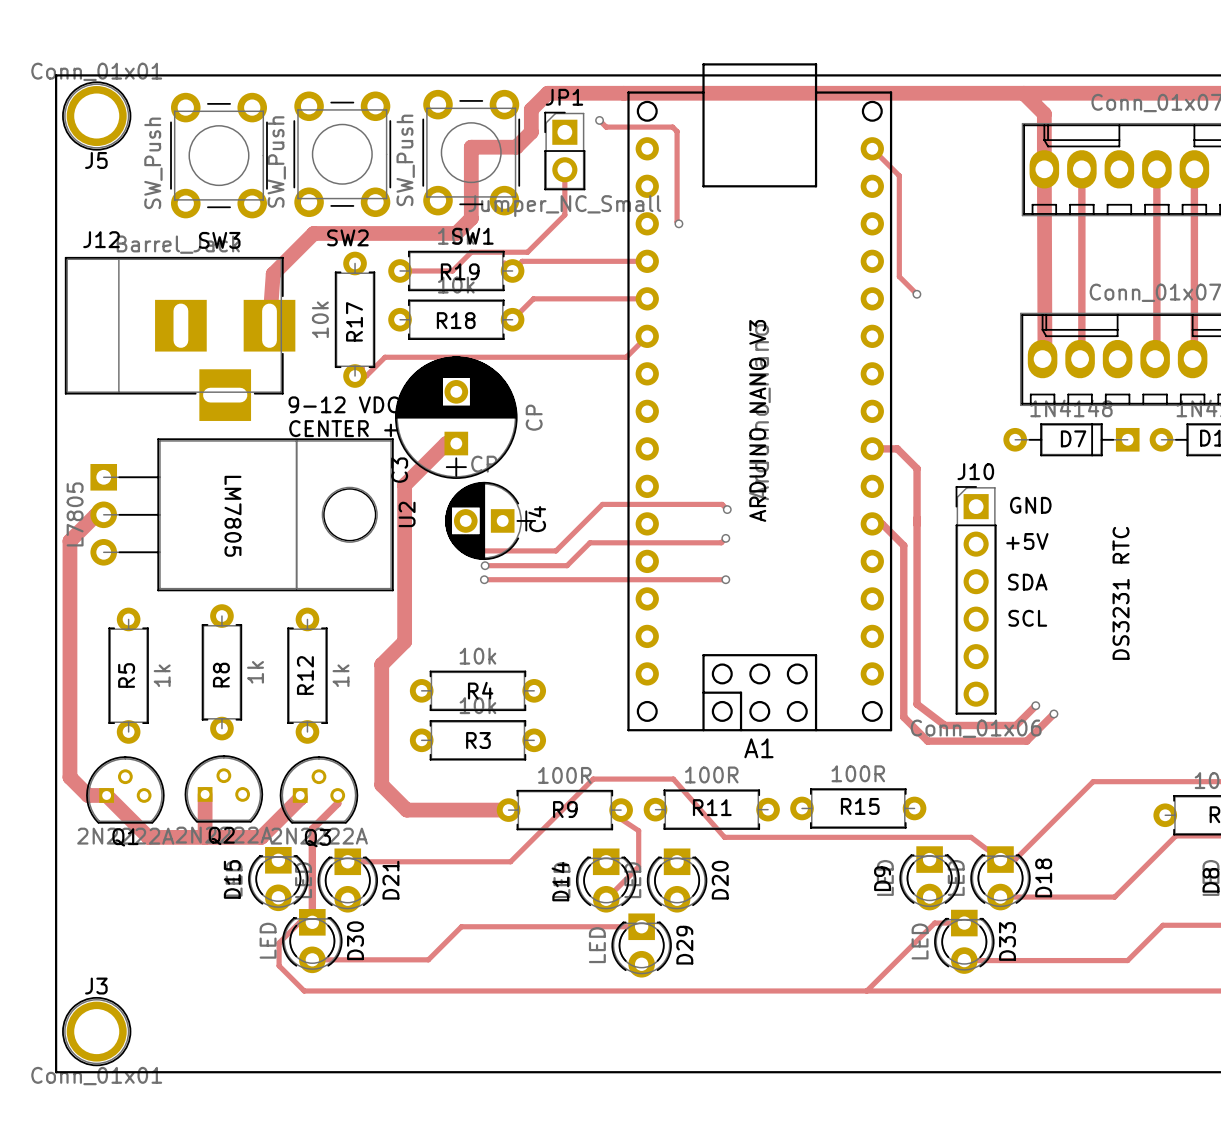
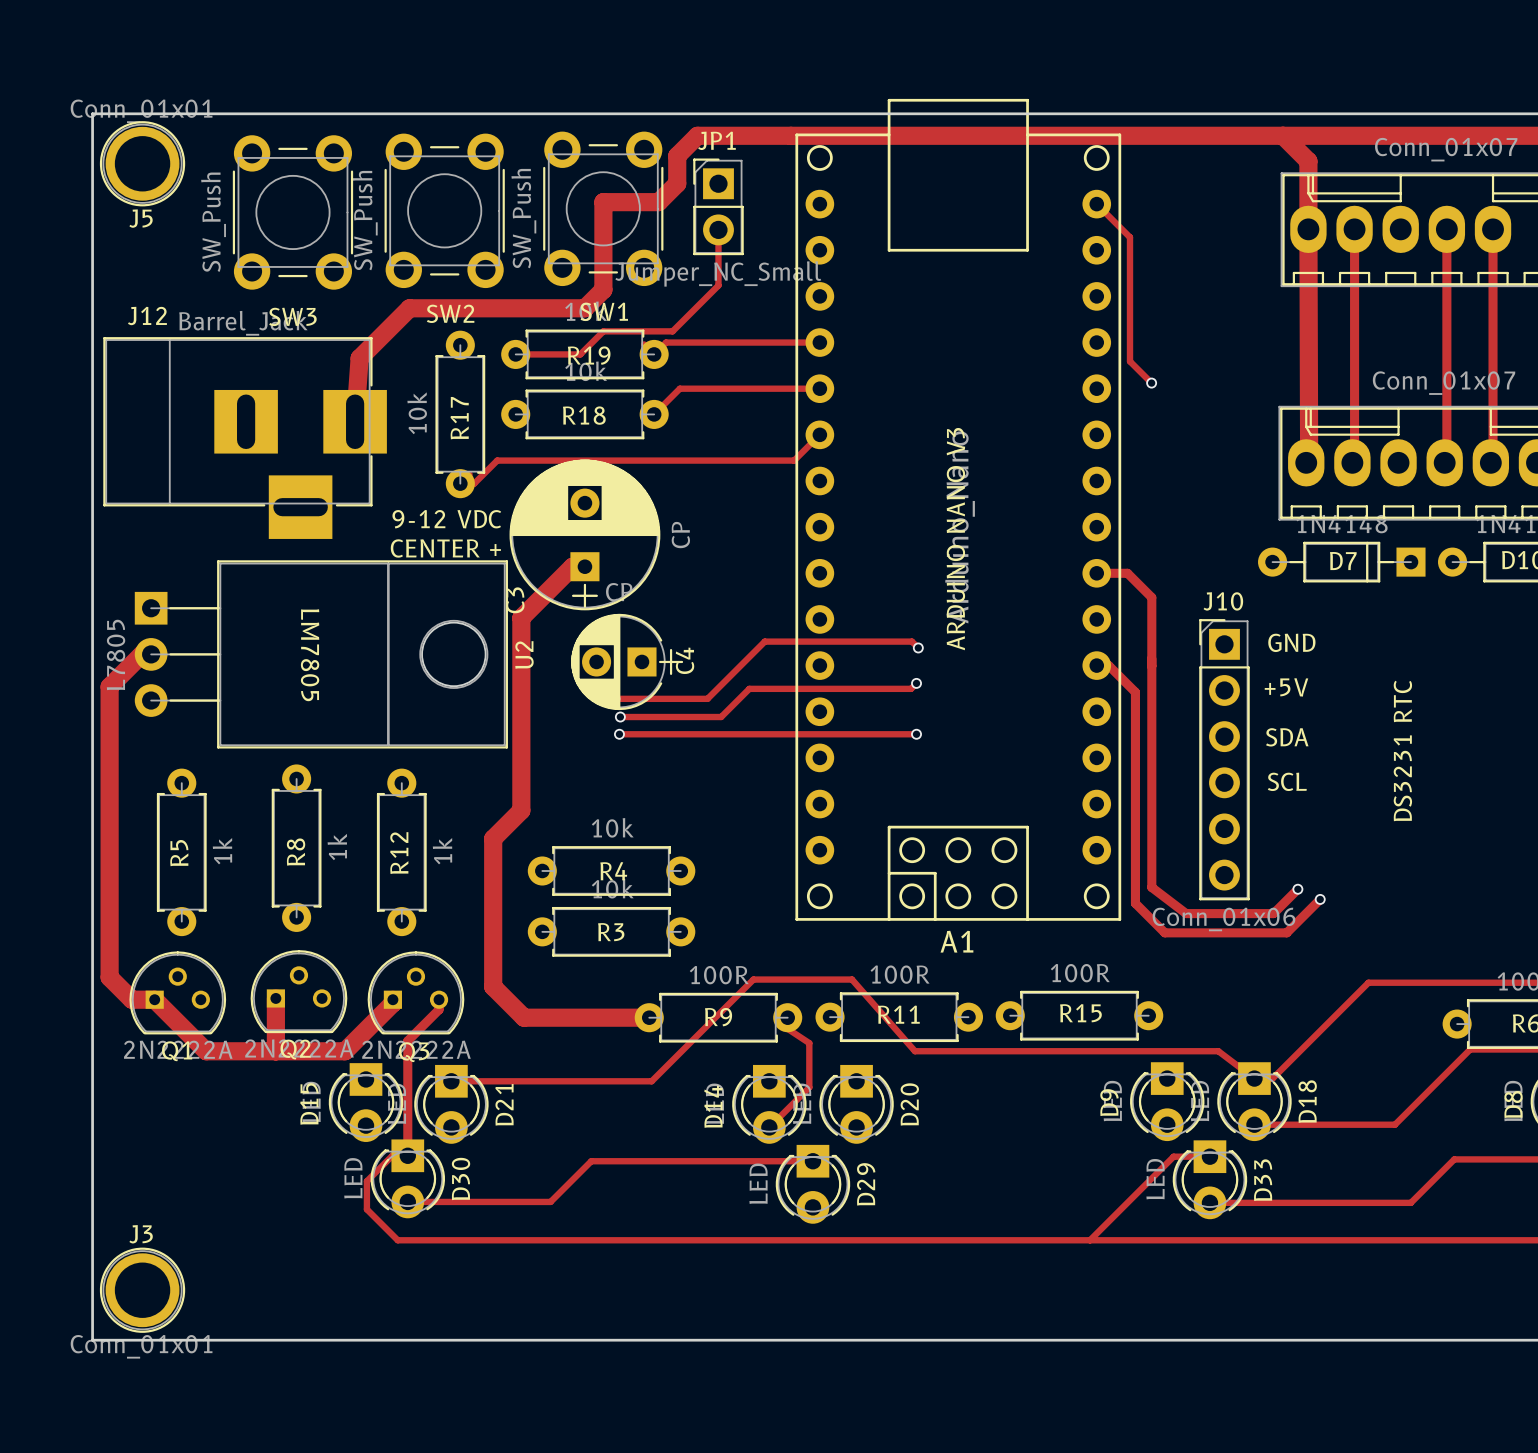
track: (599, 120) (606, 127) (672, 127) (677, 131) (677, 221) (678, 223) -> none
via: (599, 120) -> none
via: (678, 223) -> none

